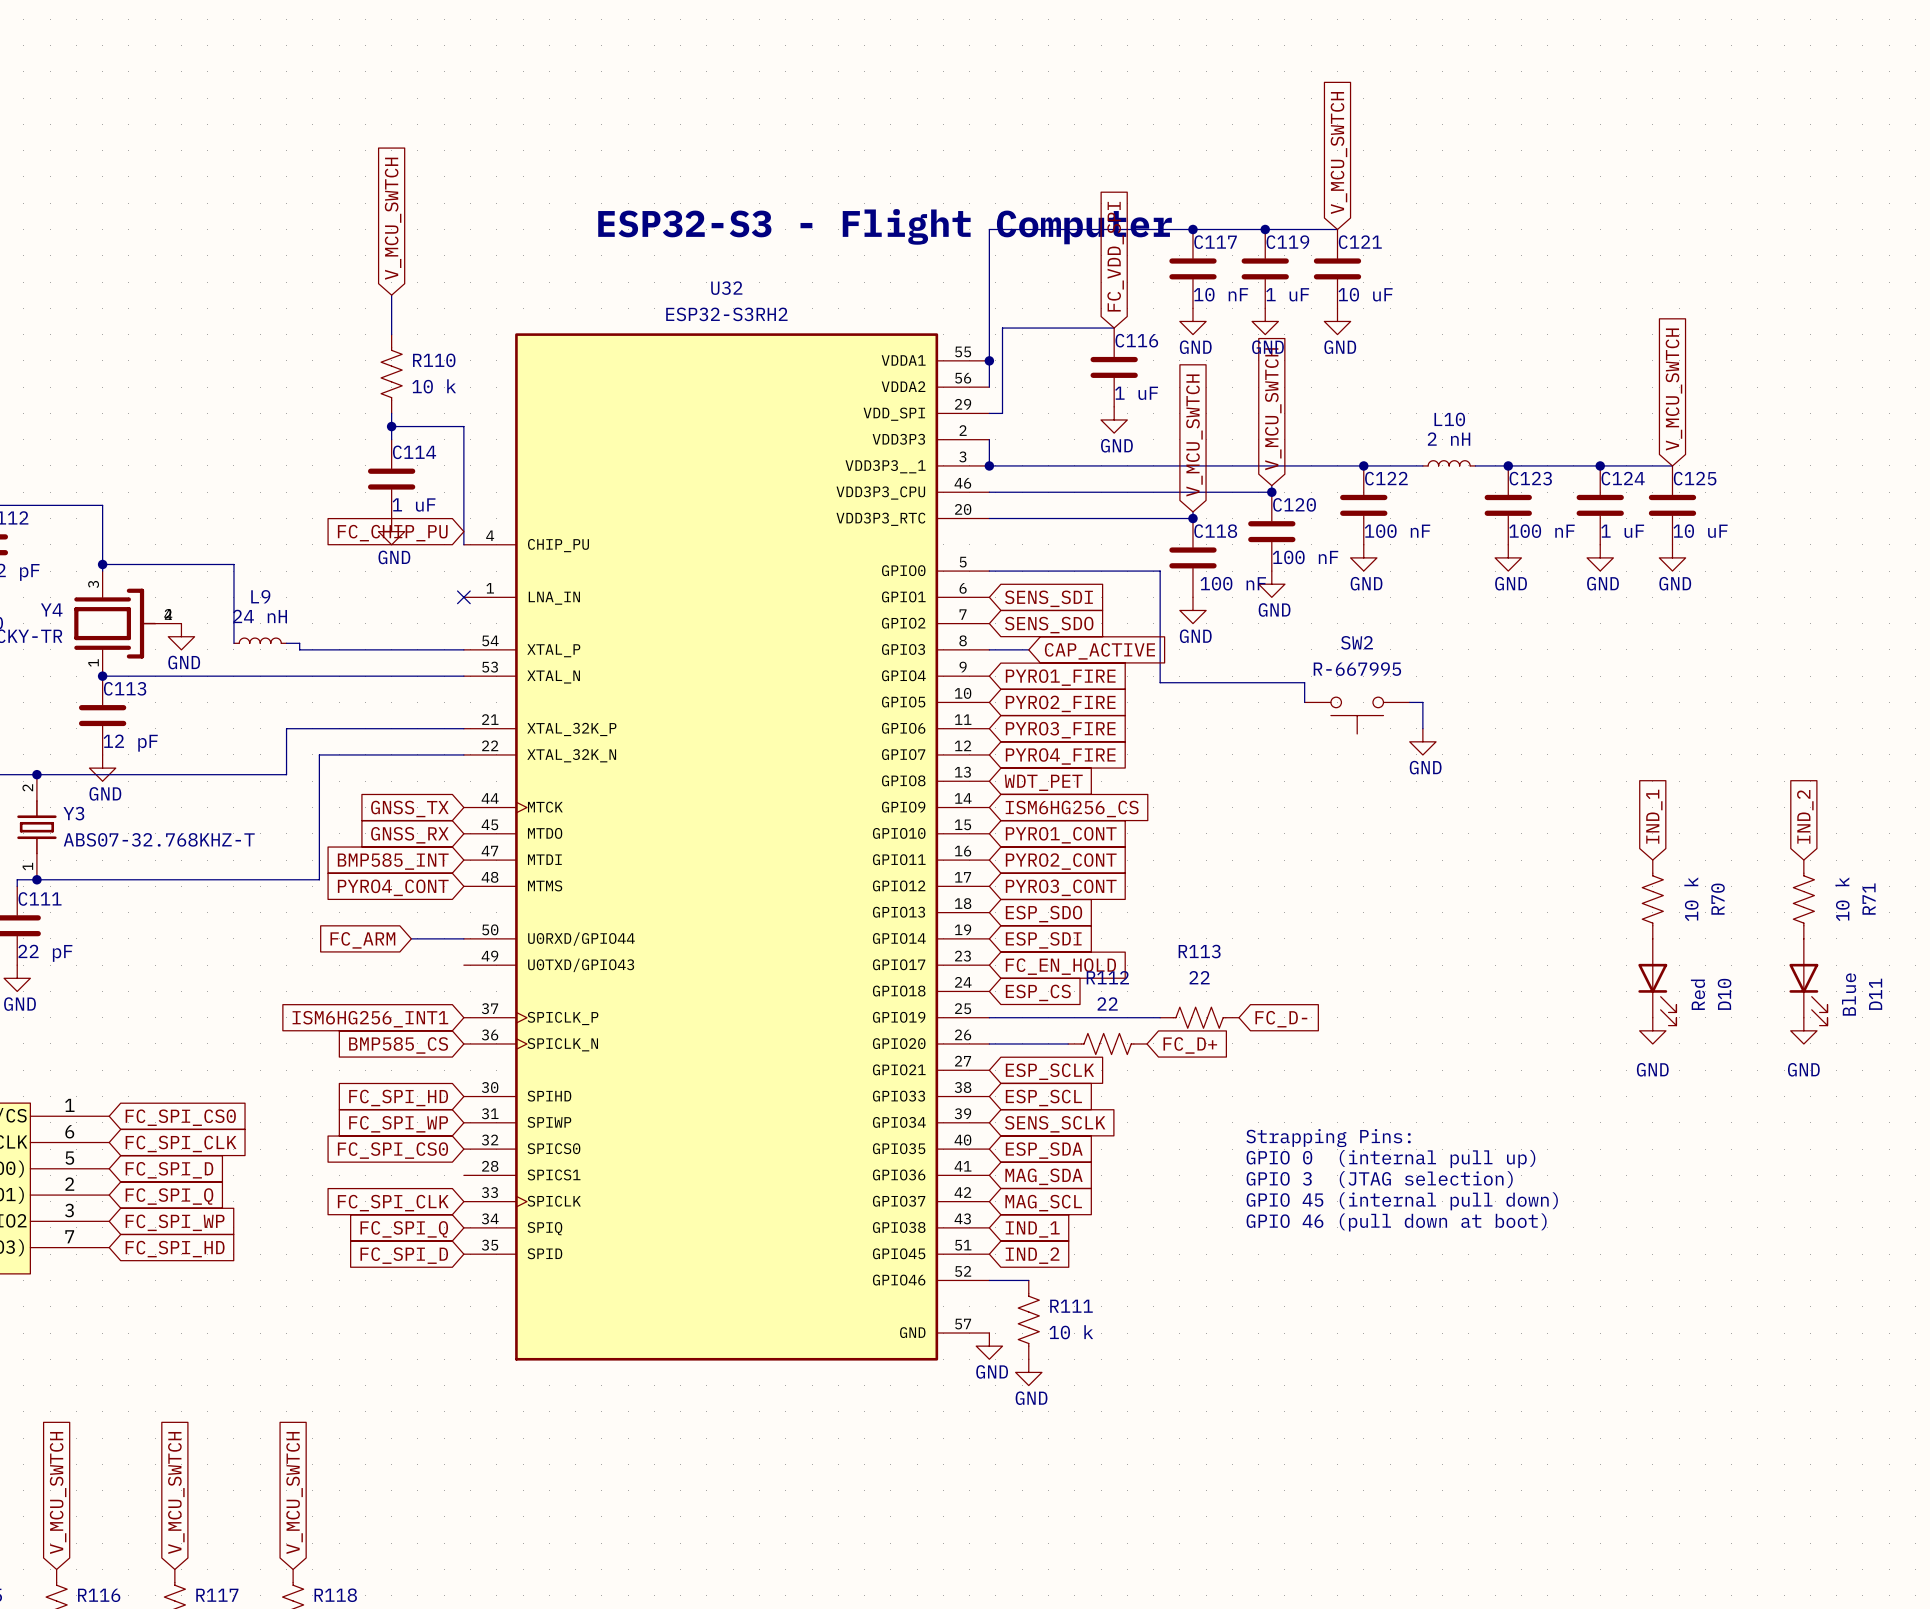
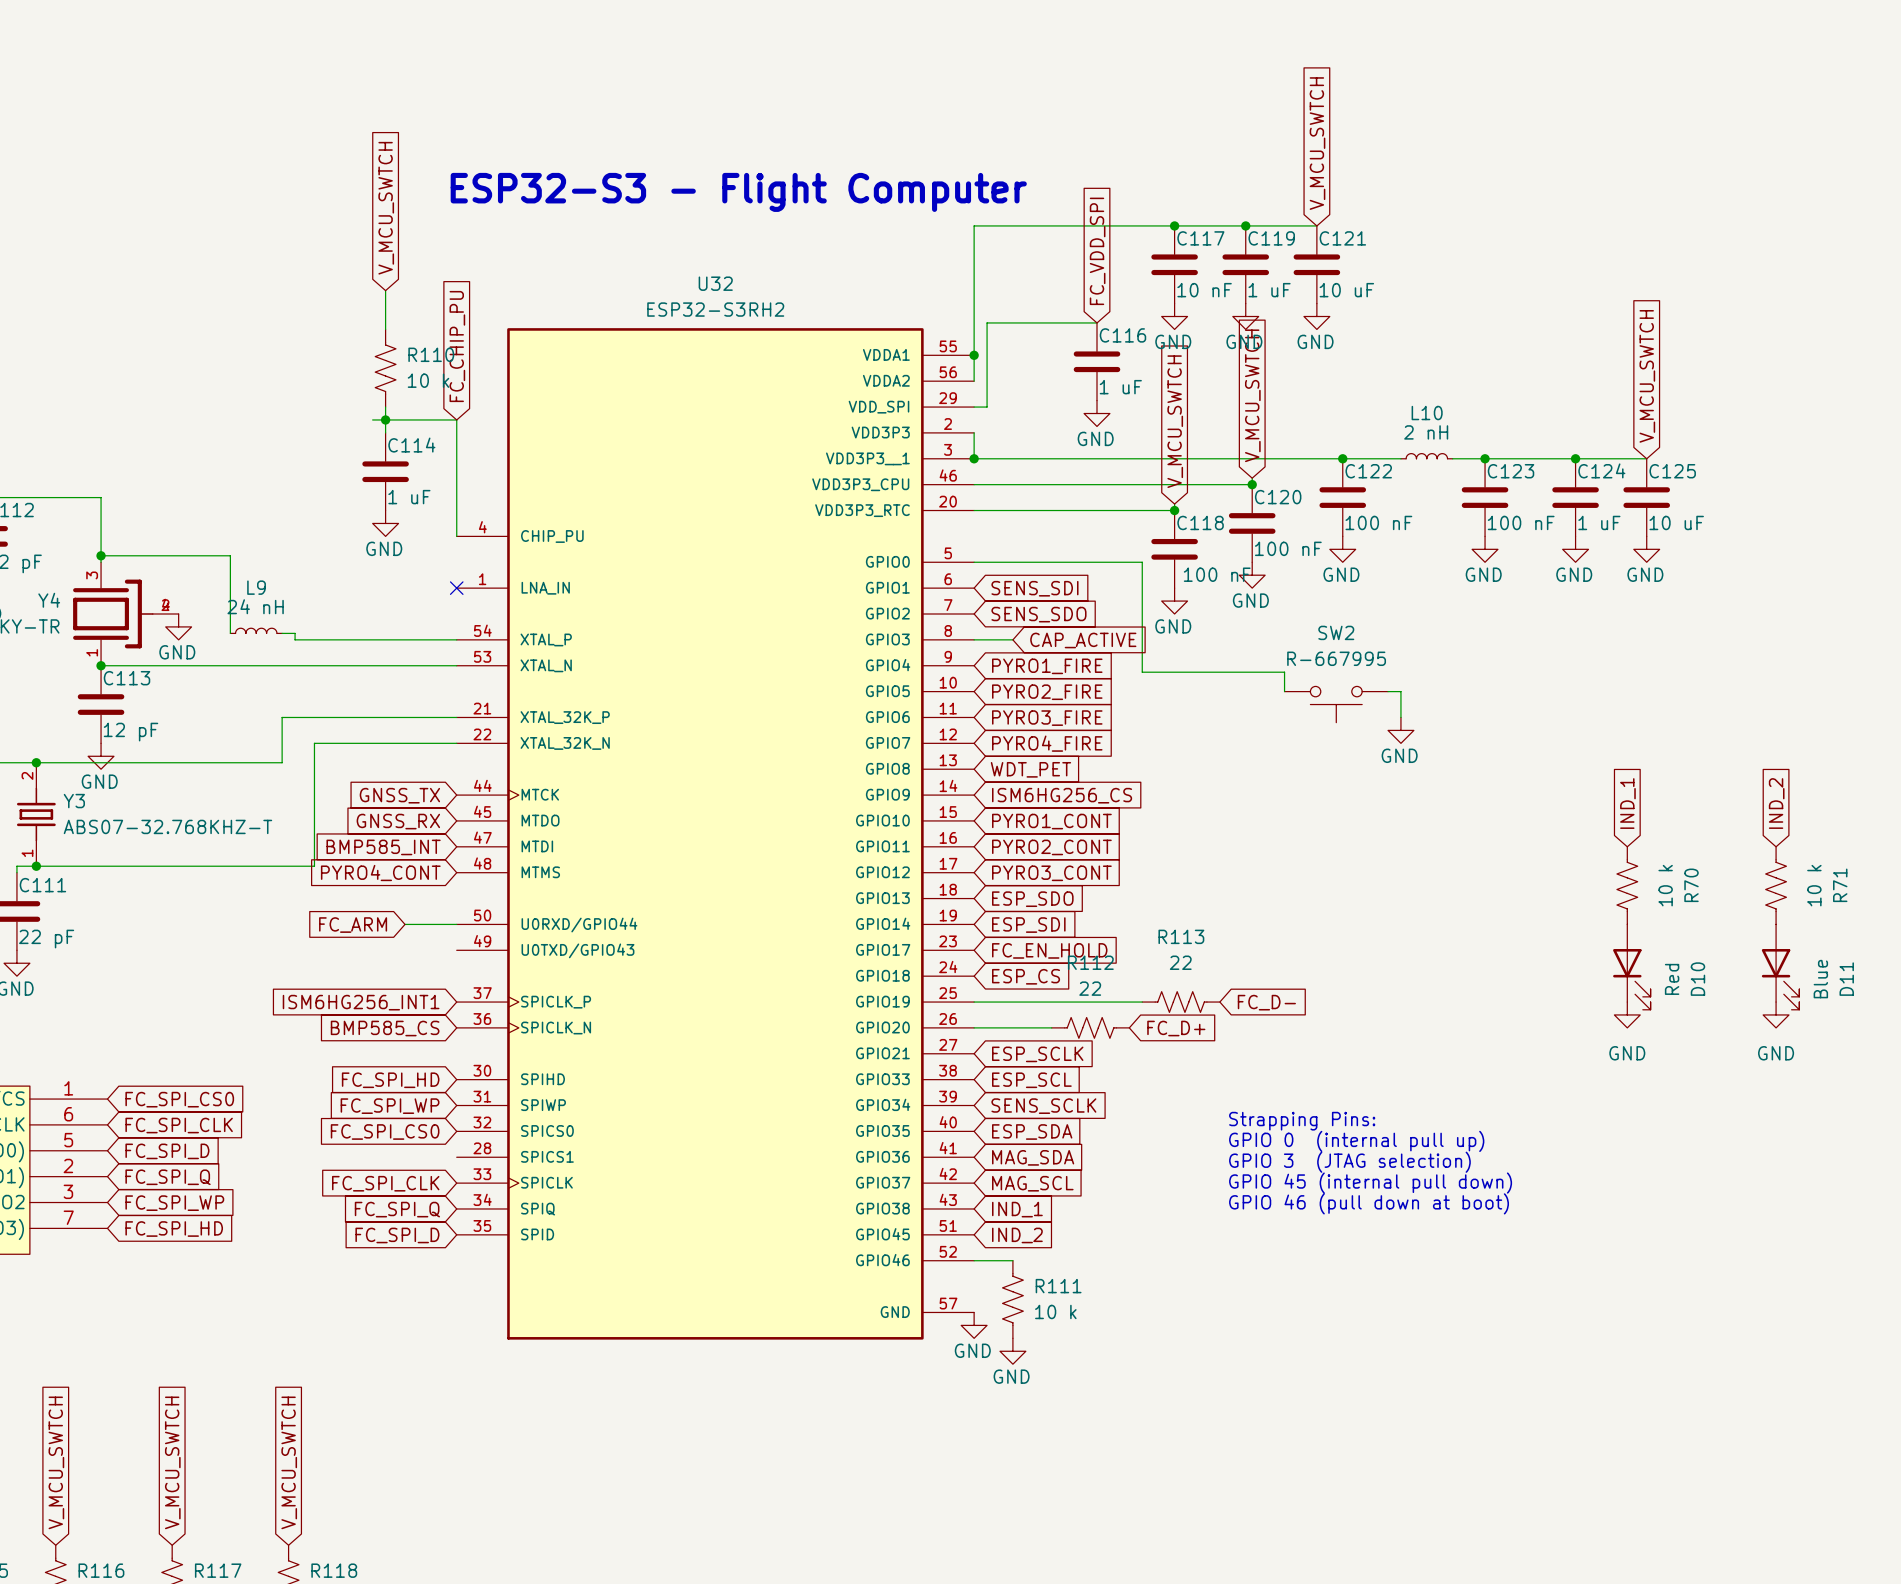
text position: ESP32-S3 - Flight Computer (885, 226) -> ESP32-S3 - Flight Computer (738, 192)
wire: none -> (372, 419) (385, 419)
global label rotation: 0° (392, 533) -> 90° clockwise (457, 346)
global label position: FC_CHIP_PU (392, 533) -> FC_CHIP_PU (457, 346)

